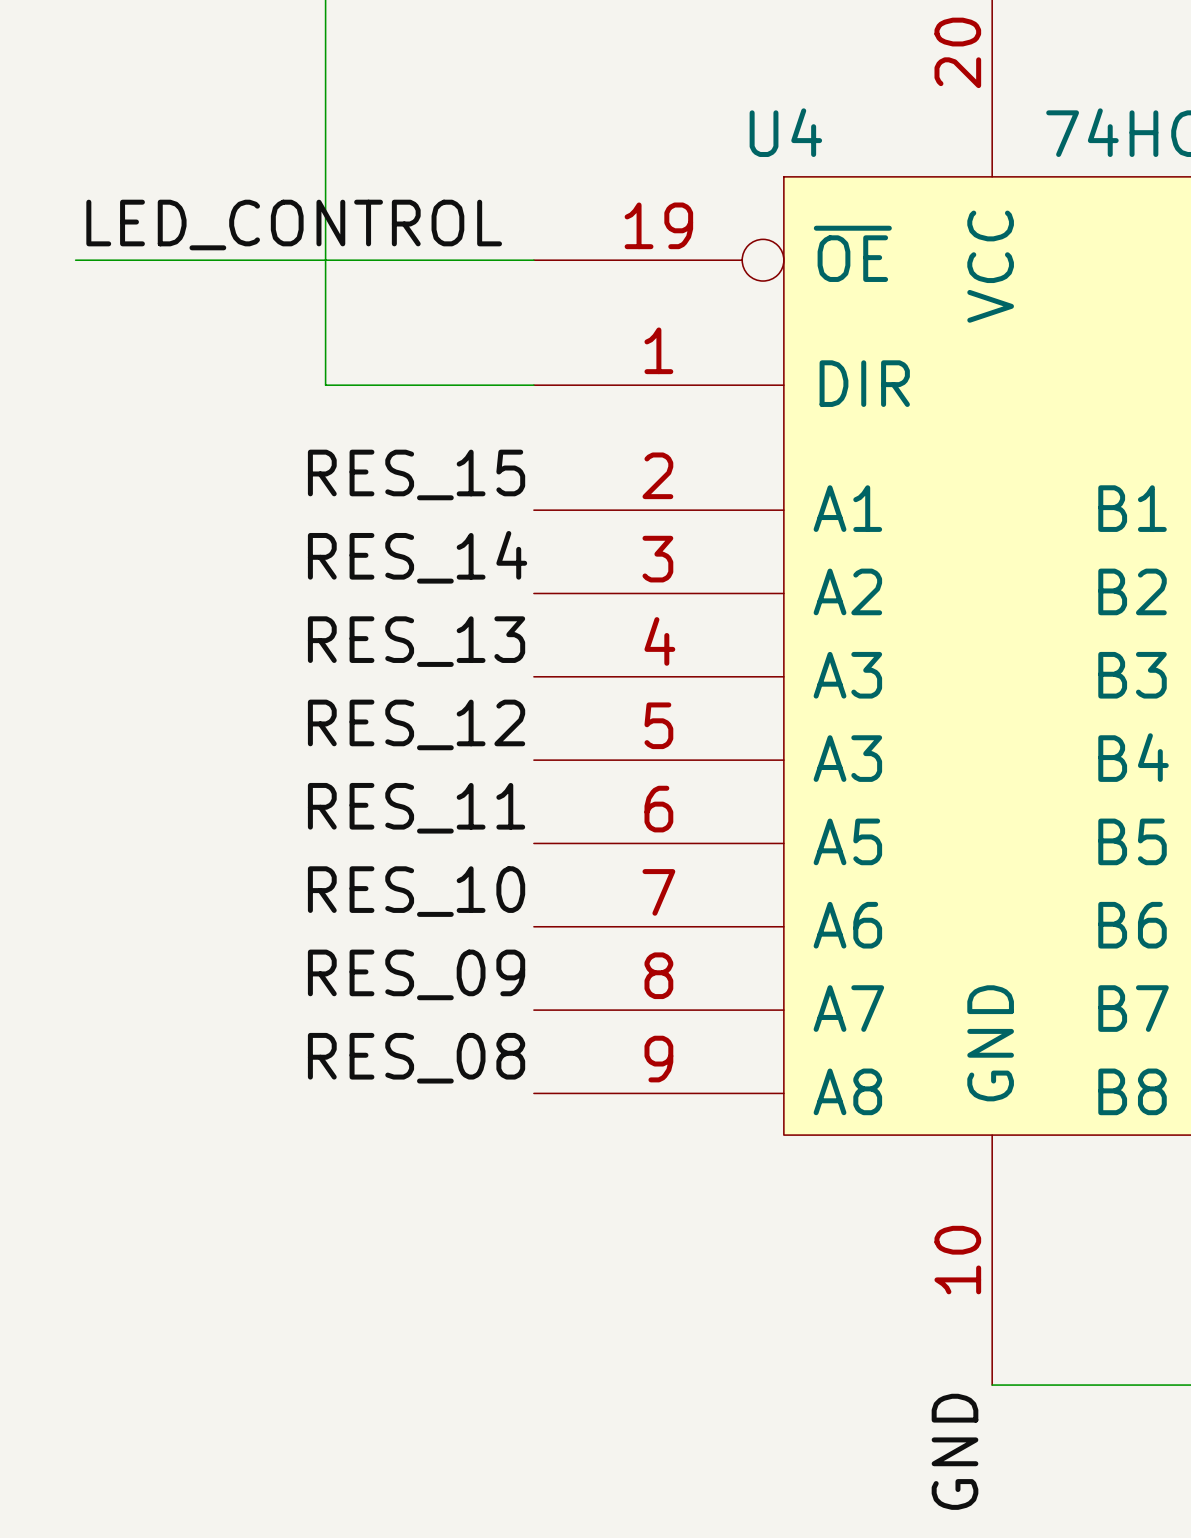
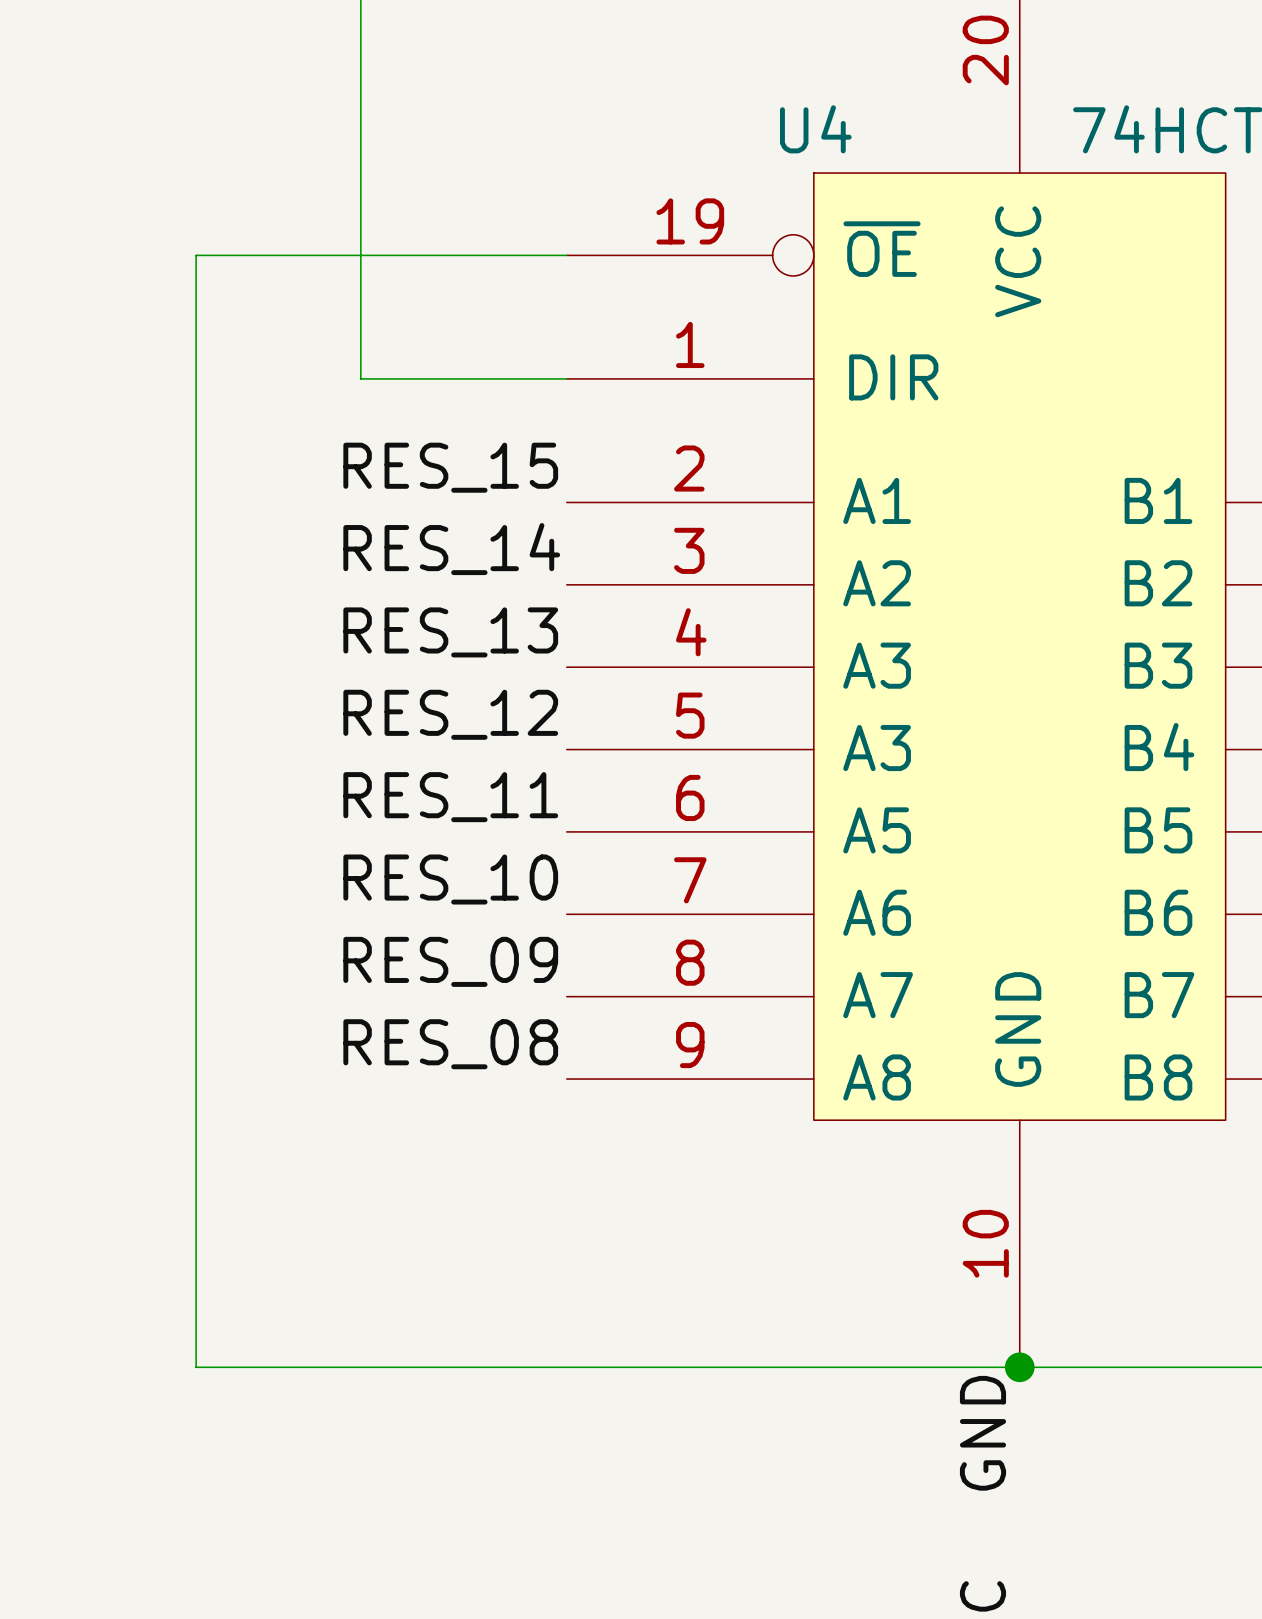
label: LED_CONTROL (294, 225) -> none
wire: (75, 260) (158, 260) -> (1019, 1367) (196, 1367) (196, 255)
junction: none -> (1019, 1367)

